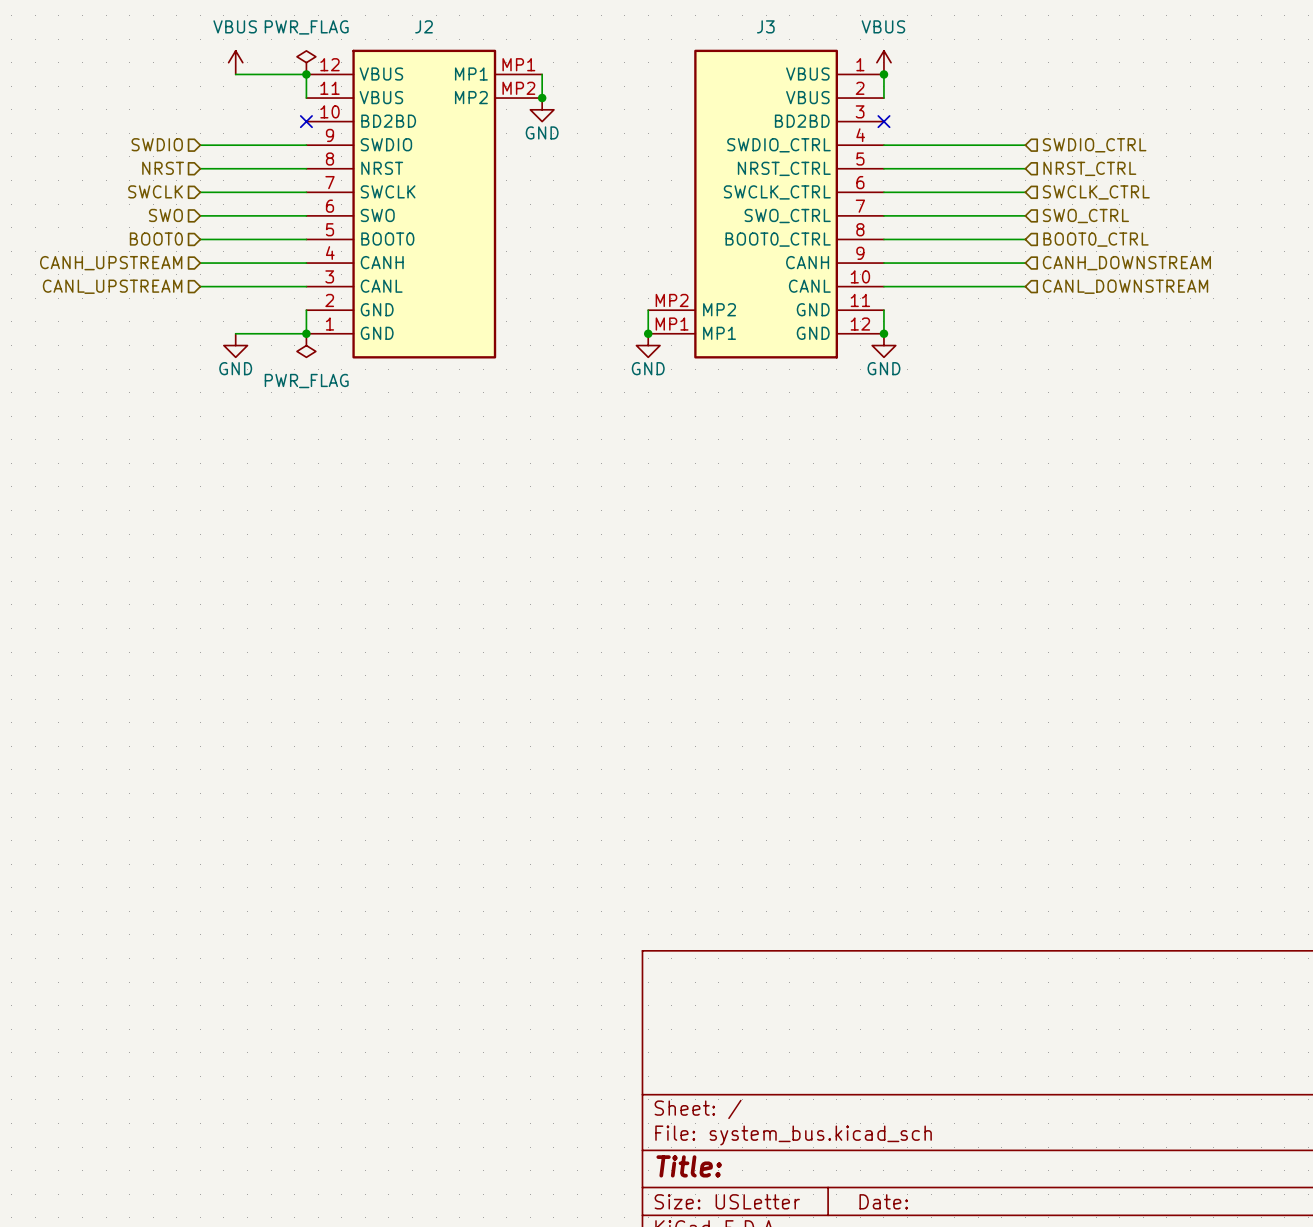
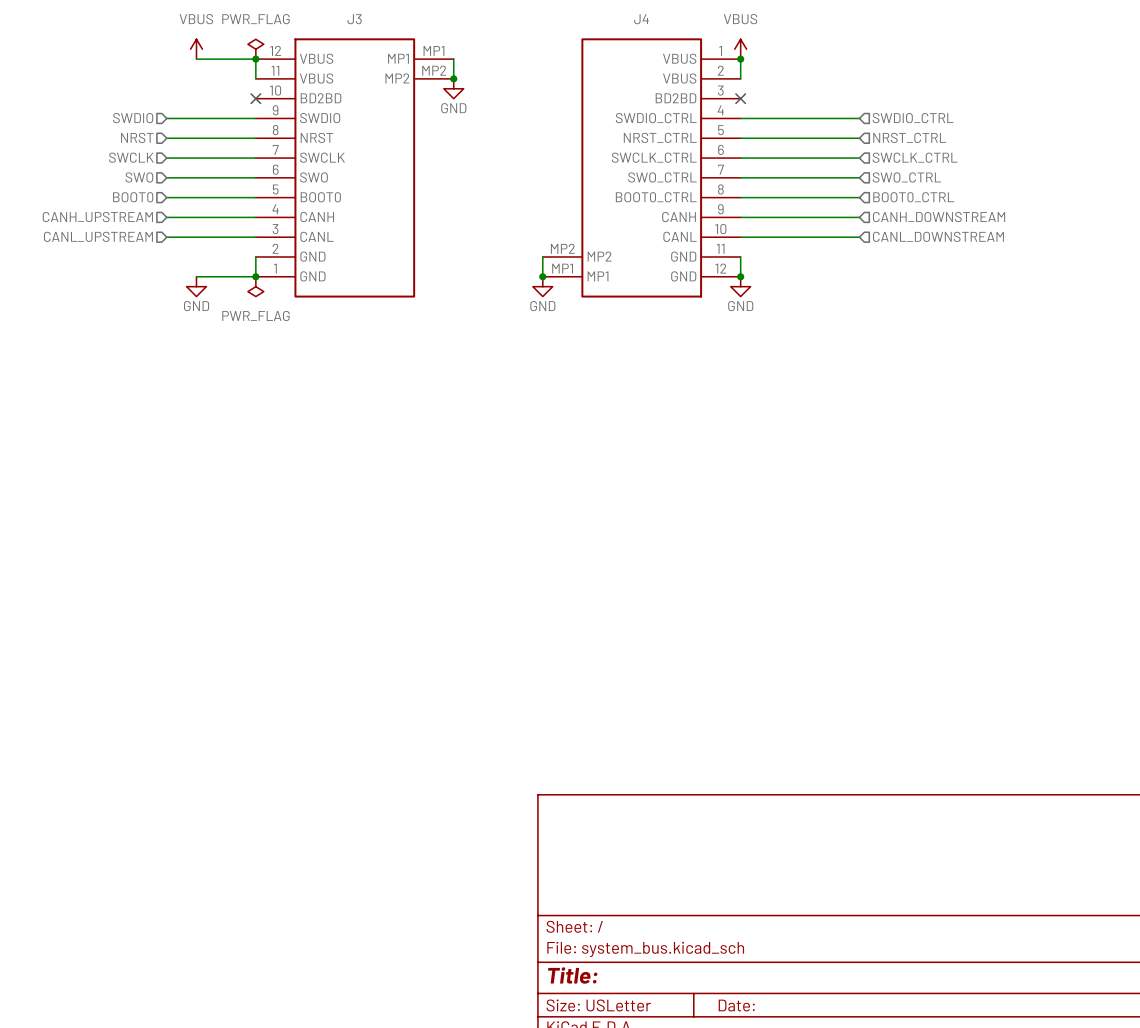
J2 name: J2 (424, 26) -> J3 (354, 19)
J3 name: J3 (765, 26) -> J4 (641, 19)

